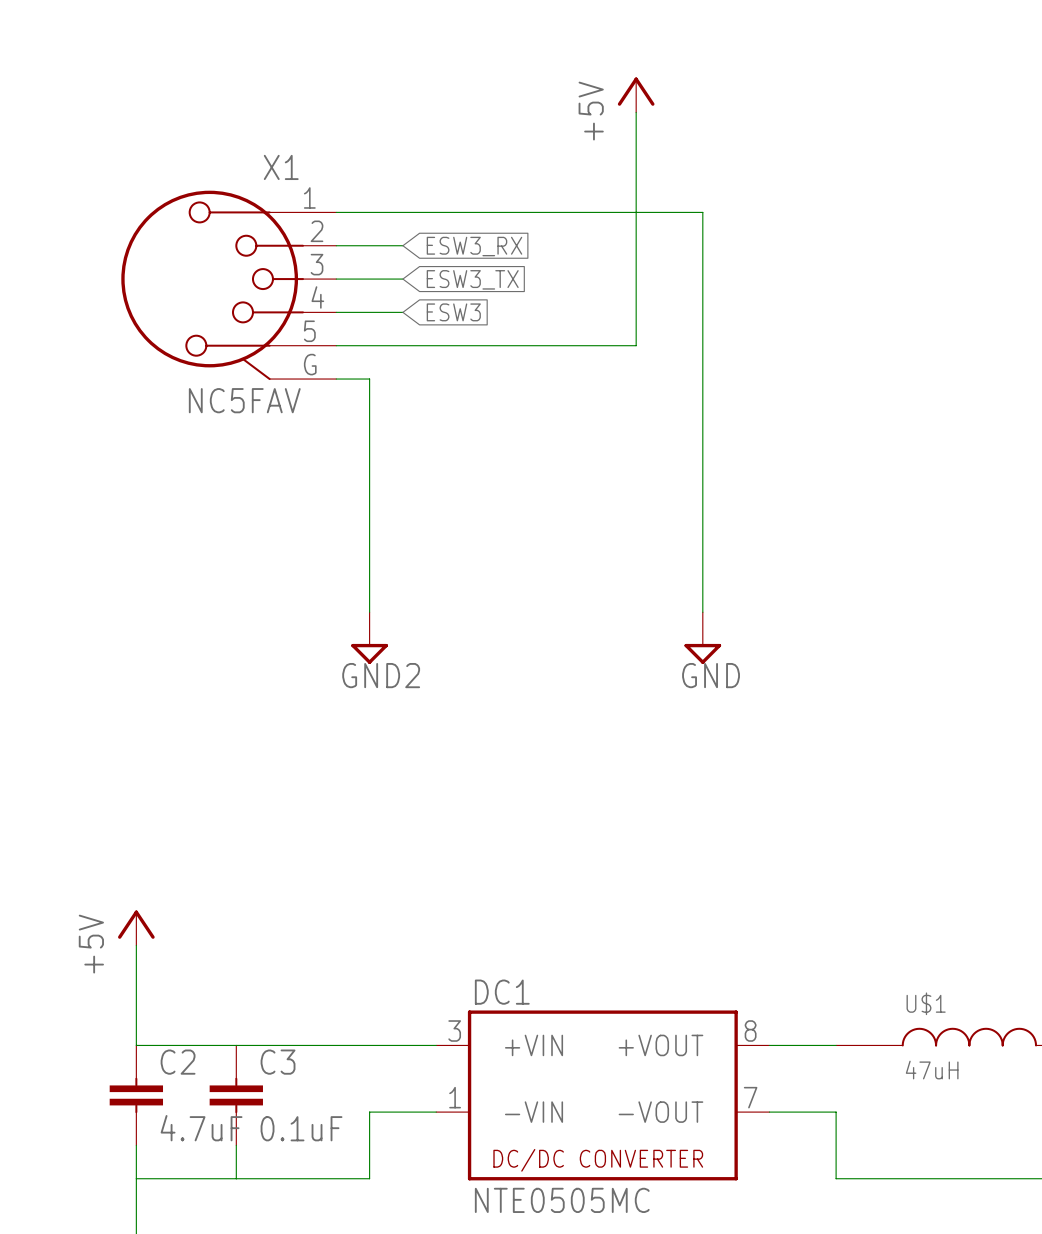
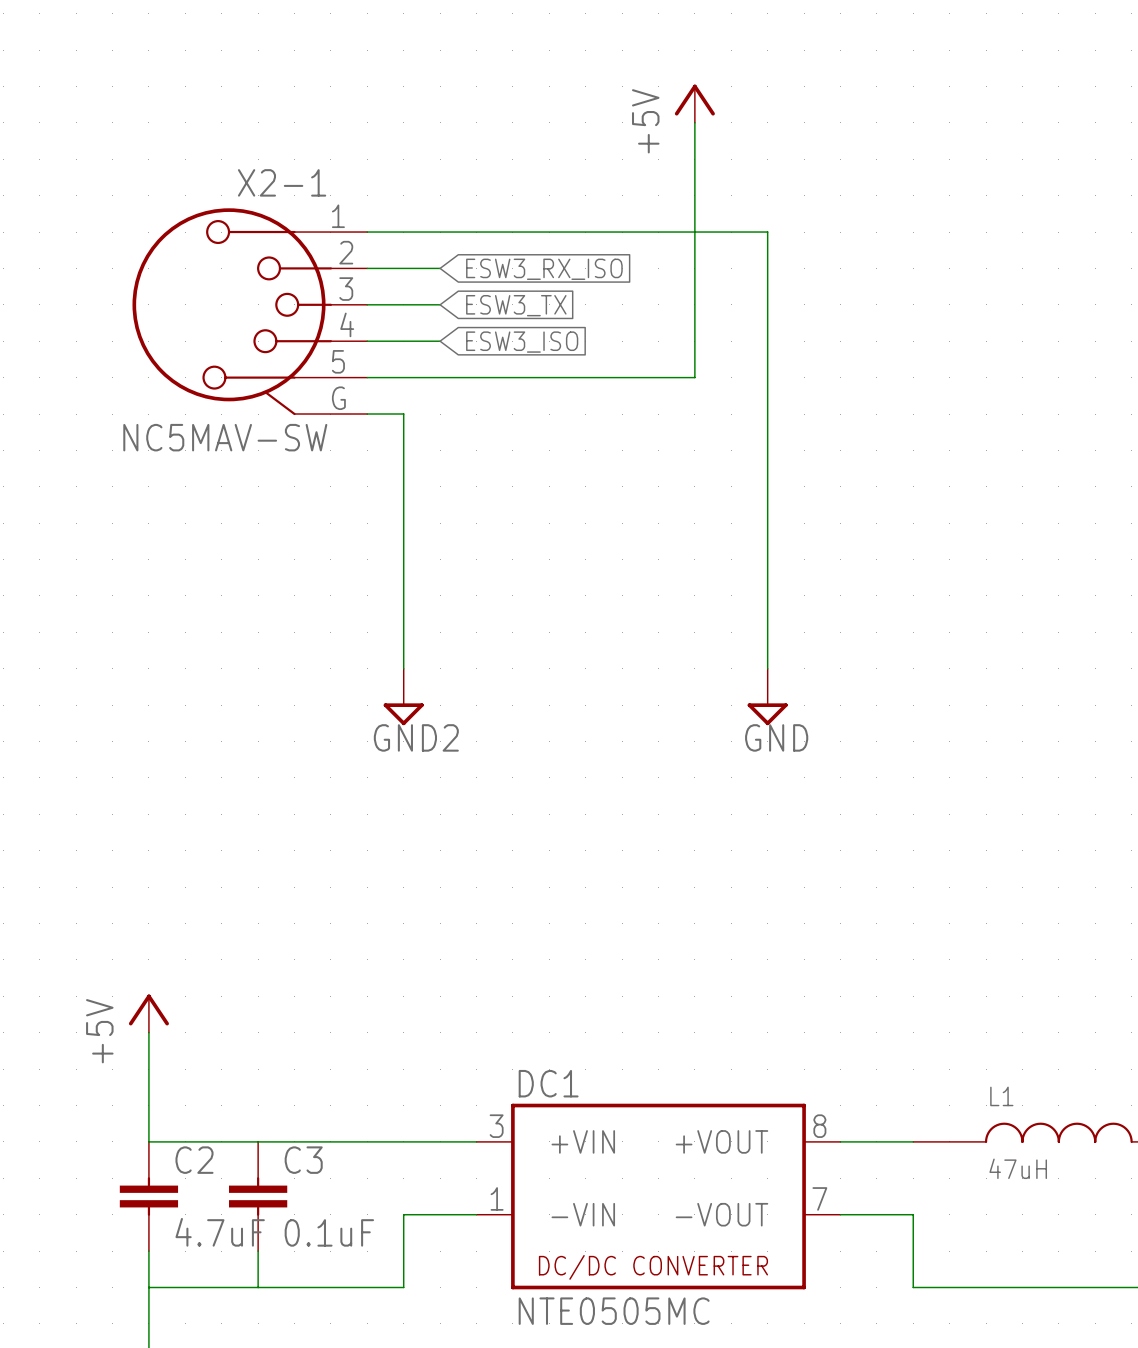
X1 name: X1 (281, 167) -> X2-1 (282, 182)
global label: ESW3_RX (474, 246) -> ESW3_RX_ISO (544, 269)
global label: ESW3 (453, 312) -> ESW3_ISO (522, 342)
X1 value: NC5FAV (244, 400) -> NC5MAV-SW (225, 437)
U$1 name: U$1 (926, 1003) -> L1 (1001, 1096)

